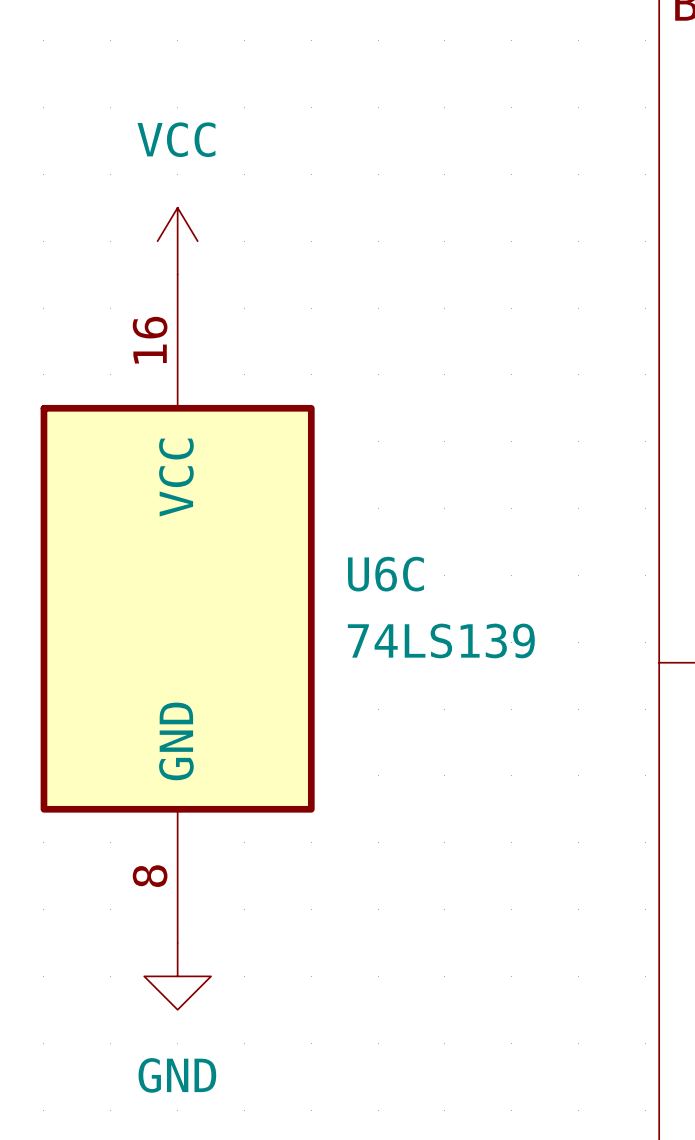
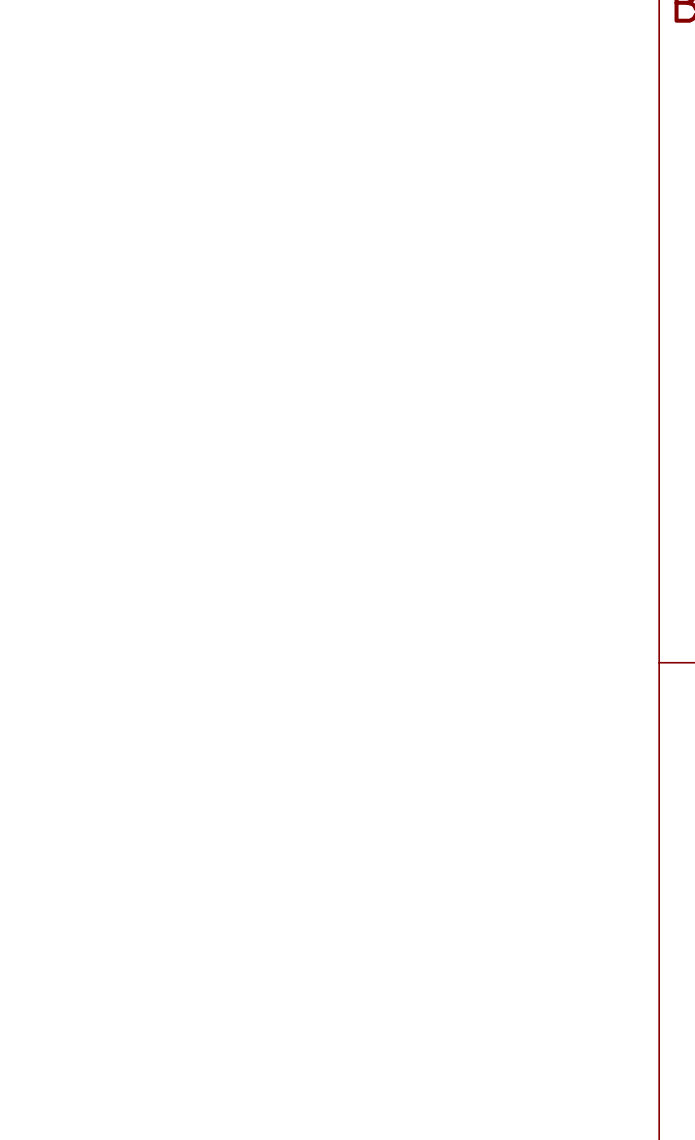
power symbol: VCC (177, 241) -> none
U6C: 74LS139 (177, 608) -> none
power symbol: GND (177, 976) -> none

